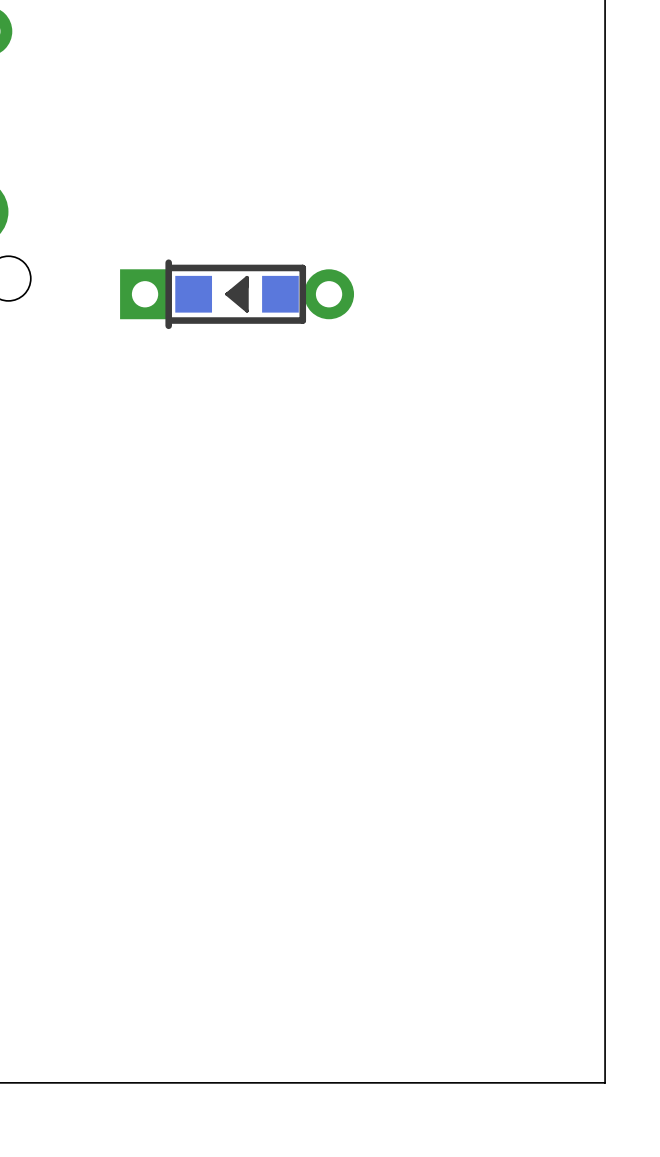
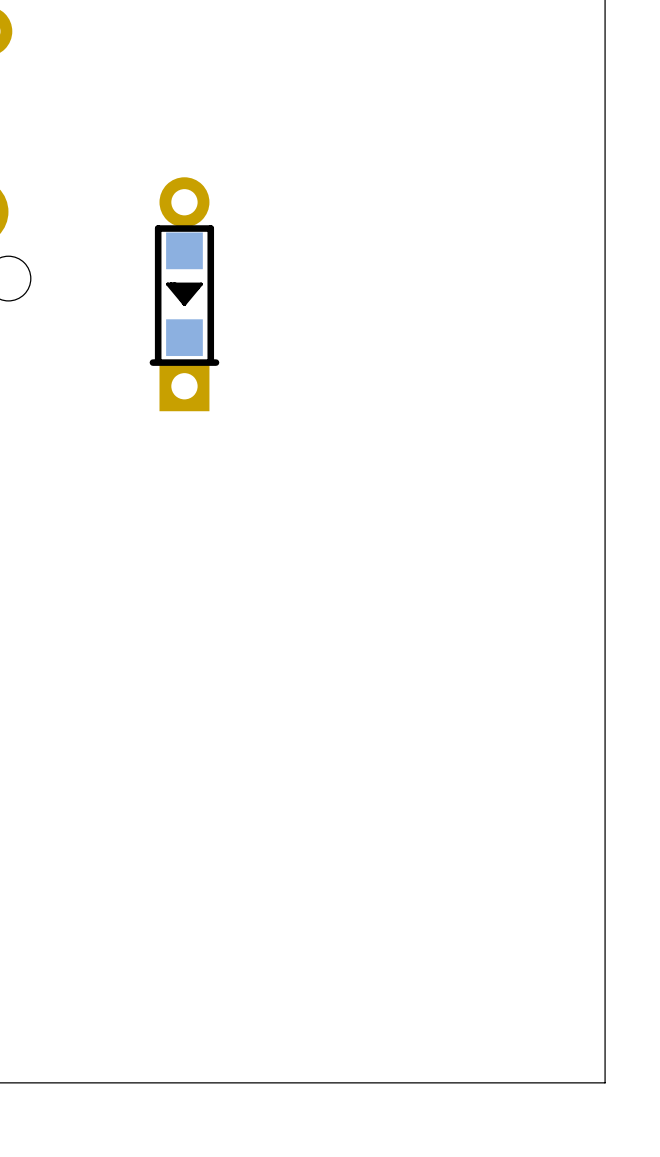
part rotation: 0° (237, 294) -> 90° counterclockwise (184, 294)

